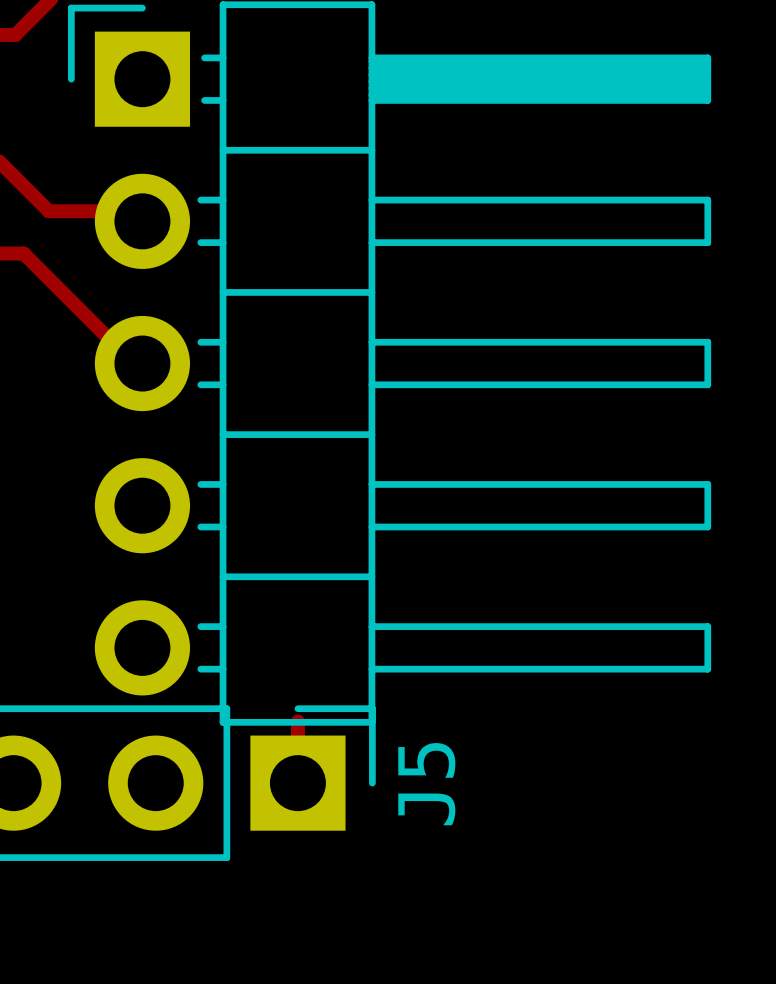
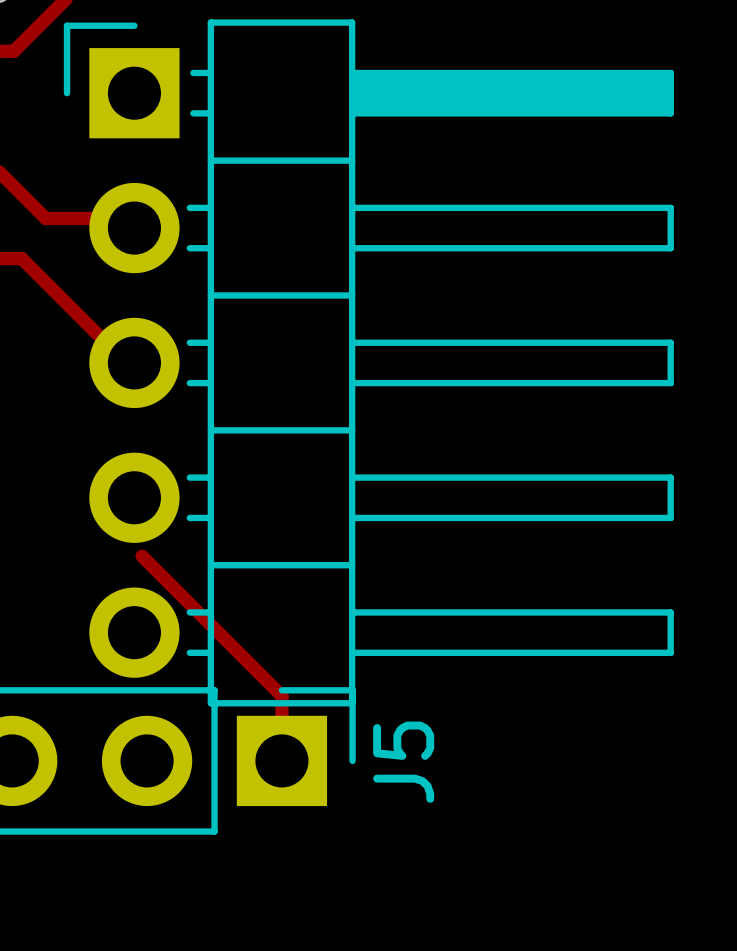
track: none -> (142, 556) (281, 696) (281, 702)

